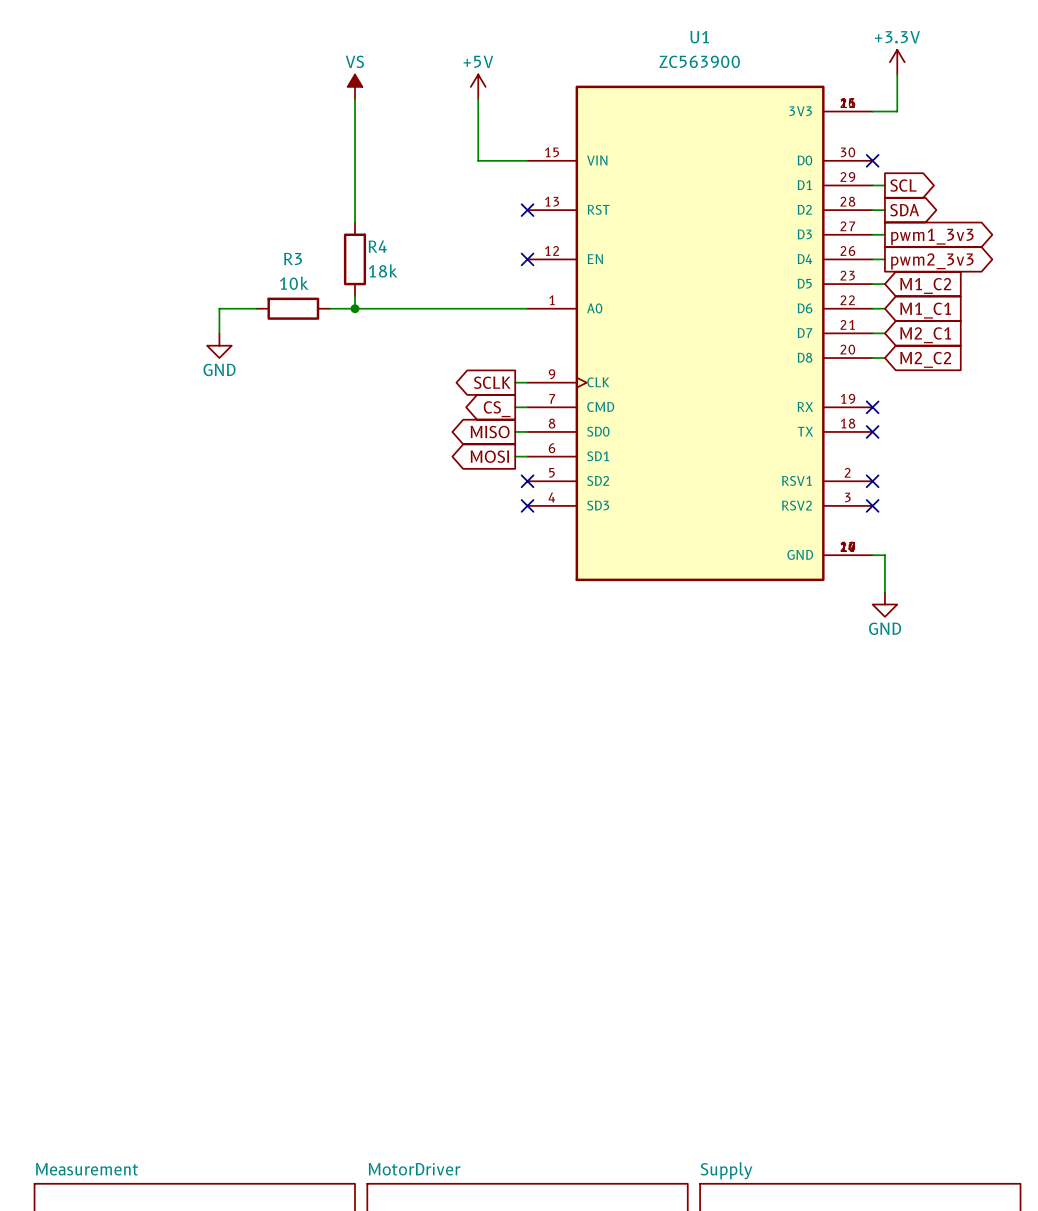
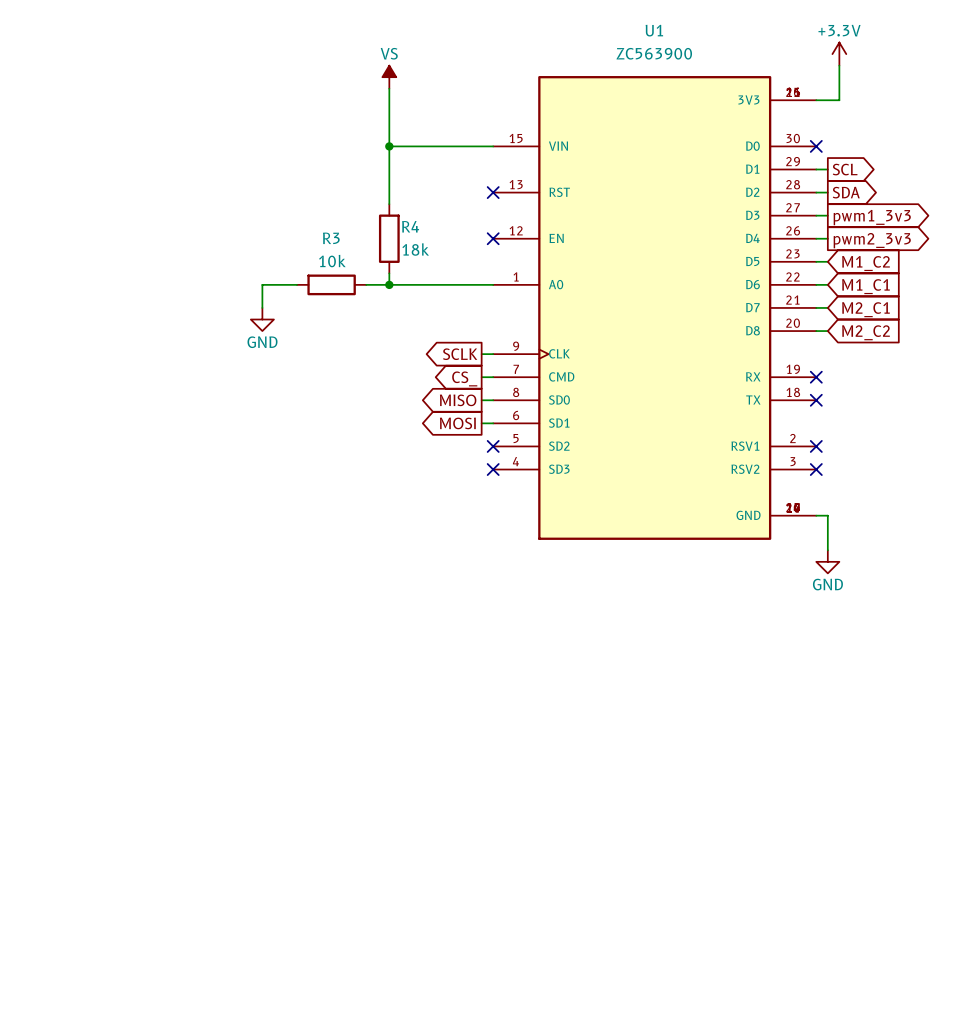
power symbol position: VS (354, 86) -> VS (389, 77)
power symbol: +5V (478, 86) -> none
wire: (354, 99) (354, 222) -> (389, 88) (389, 204)
wire: (478, 99) (478, 160) -> (389, 146) (447, 146)
junction: none -> (389, 146)
R4 position: (354, 259) -> (389, 238)
wire: (354, 296) (354, 308) -> (389, 273) (389, 284)
wire: (256, 308) (219, 308) (219, 333) -> (297, 284) (262, 284) (262, 307)
R3 position: (293, 308) -> (331, 284)
wire: (330, 308) (391, 308) -> none
junction: (354, 308) -> none
junction: none -> (389, 284)
power symbol position: GND (219, 345) -> GND (262, 319)

